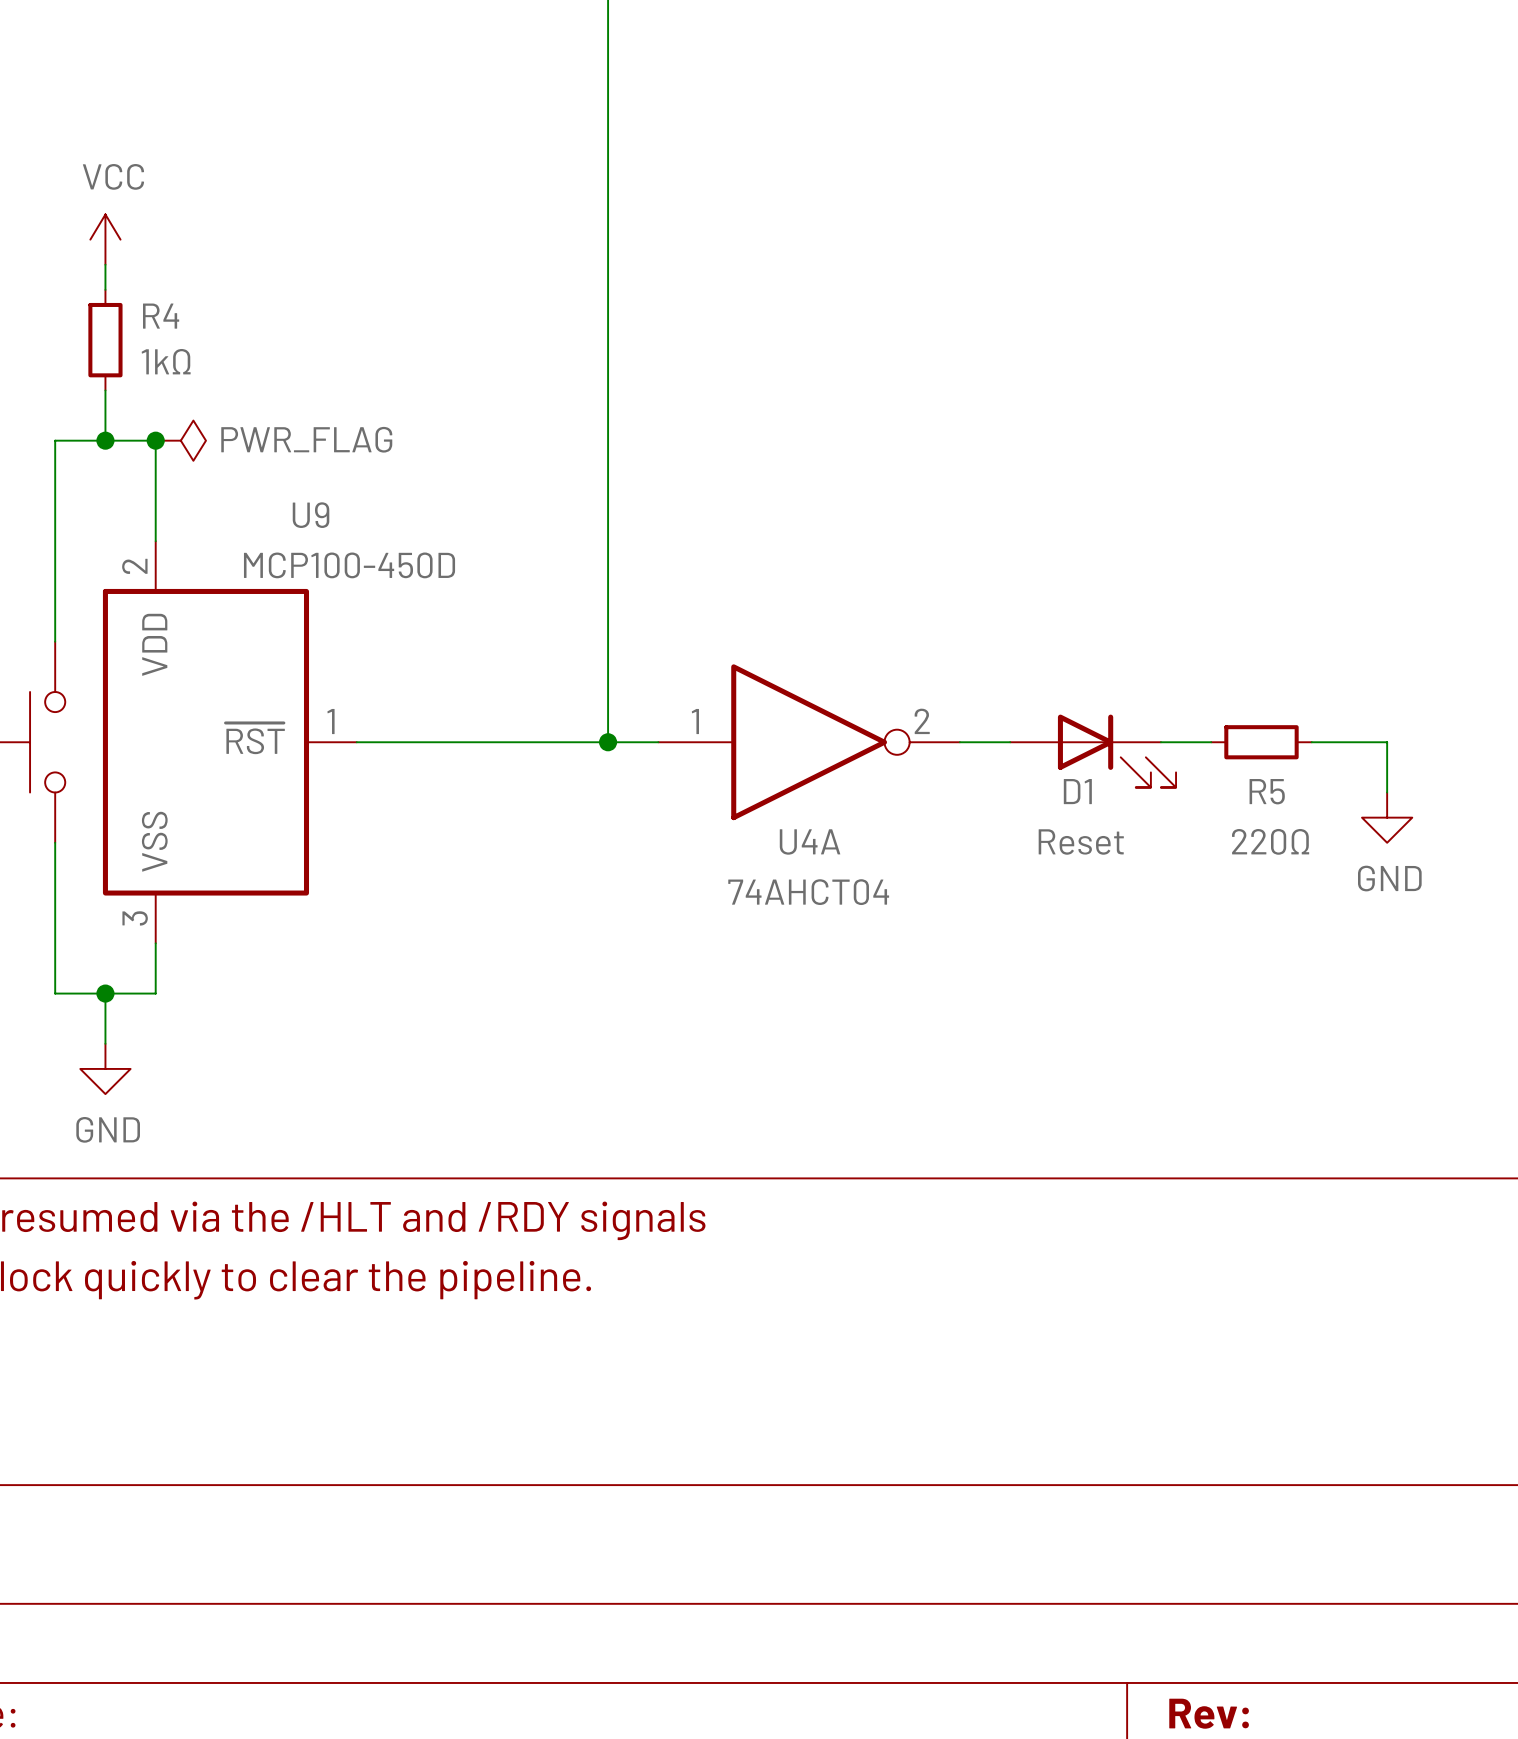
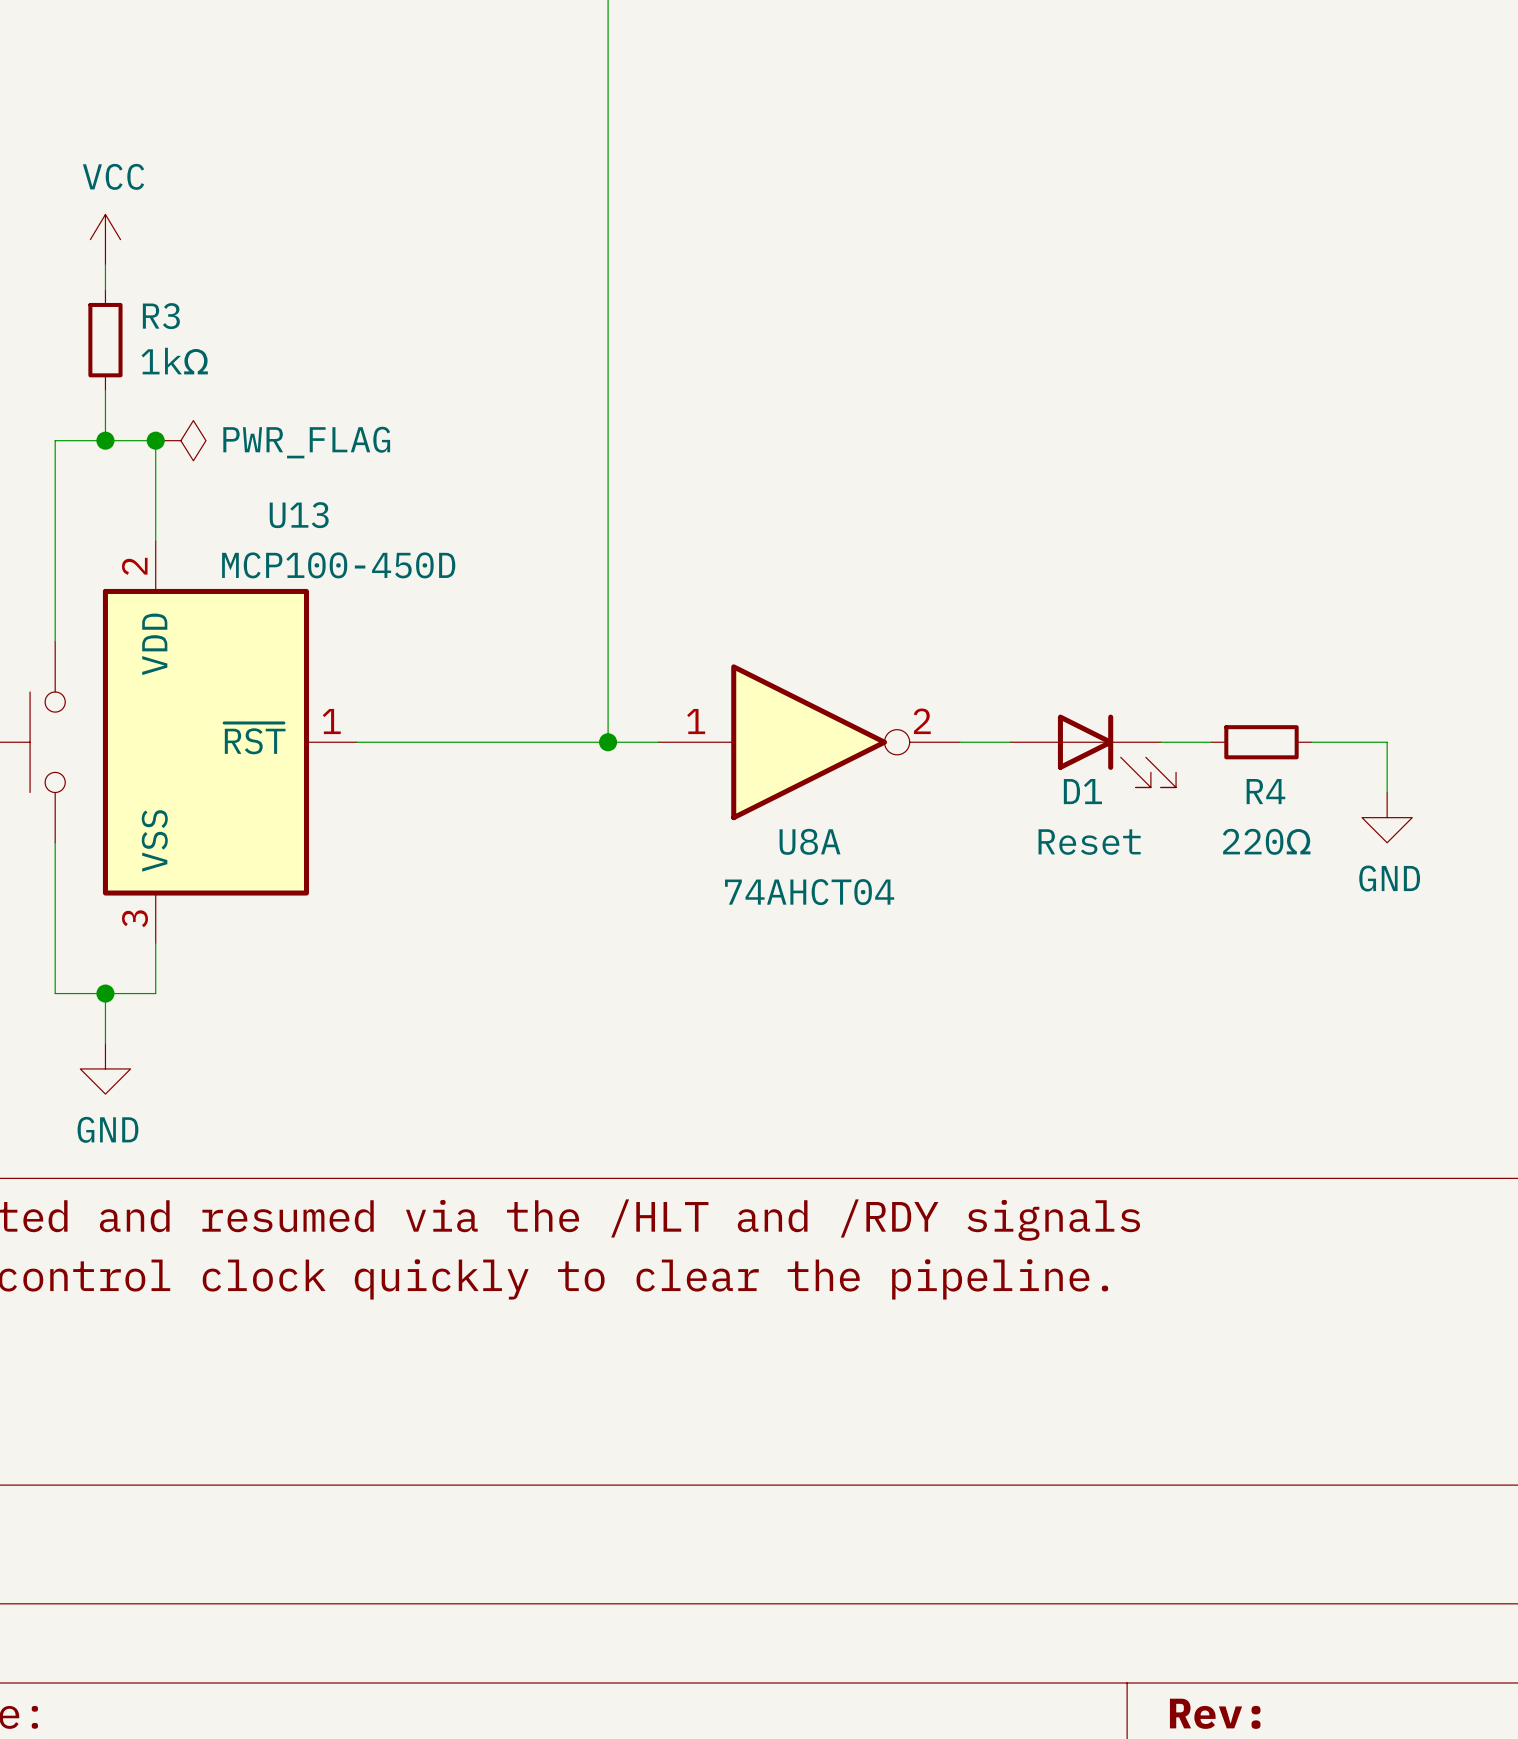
R4 name: R4 (161, 316) -> R3 (161, 316)
U9 name: U9 (311, 515) -> U13 (299, 515)
R5 name: R5 (1267, 791) -> R4 (1265, 791)
U4A name: U4A (810, 841) -> U8A (810, 841)

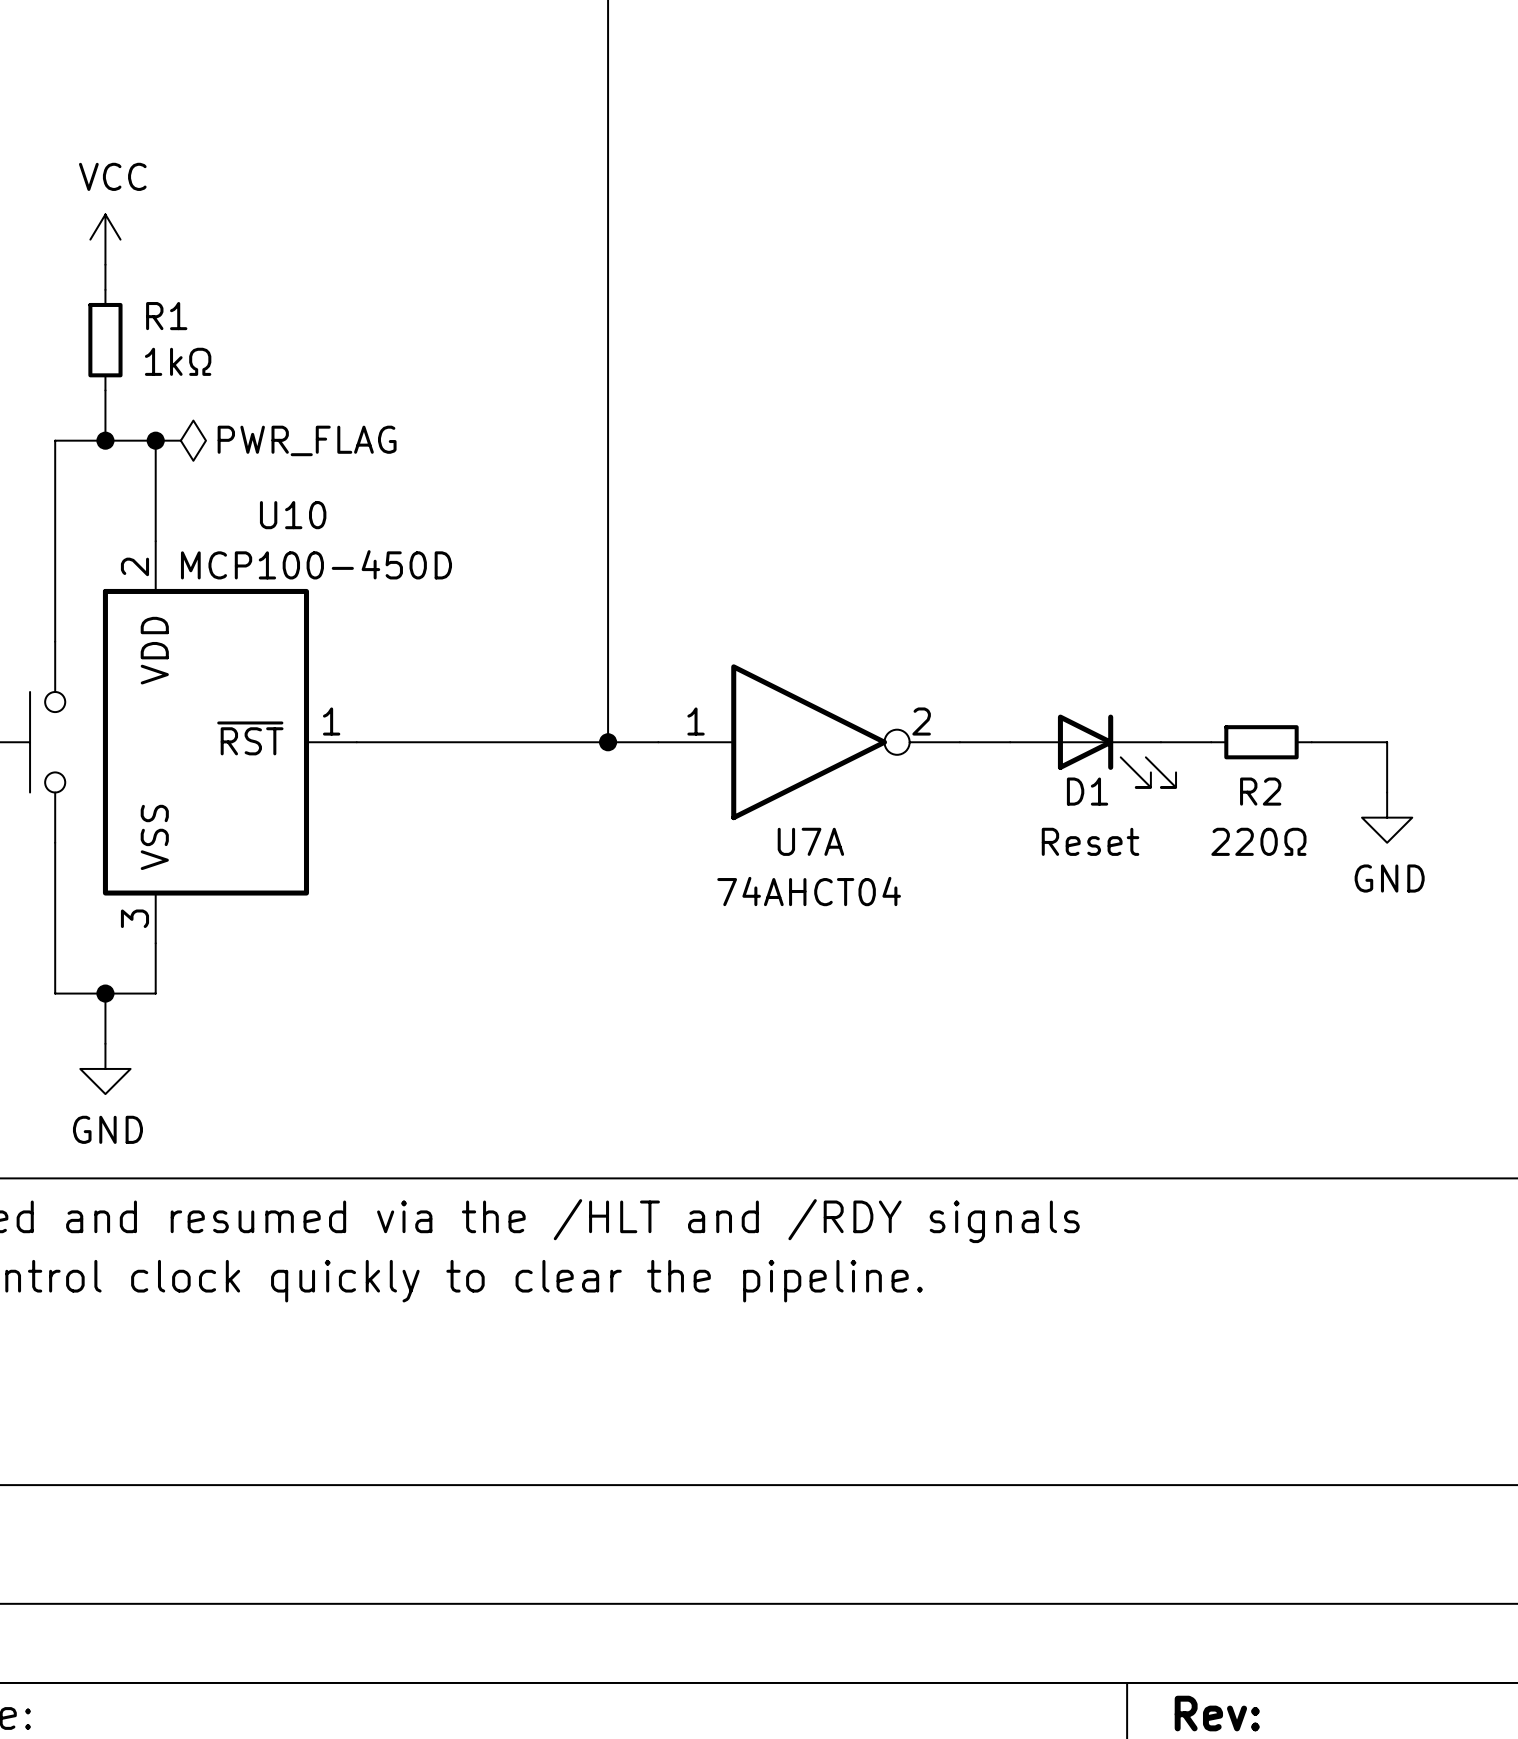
R3 name: R3 (161, 316) -> R1 (166, 316)
U13 name: U13 (299, 515) -> U10 (293, 515)
R4 name: R4 (1265, 791) -> R2 (1260, 791)
U8A name: U8A (810, 841) -> U7A (810, 841)

